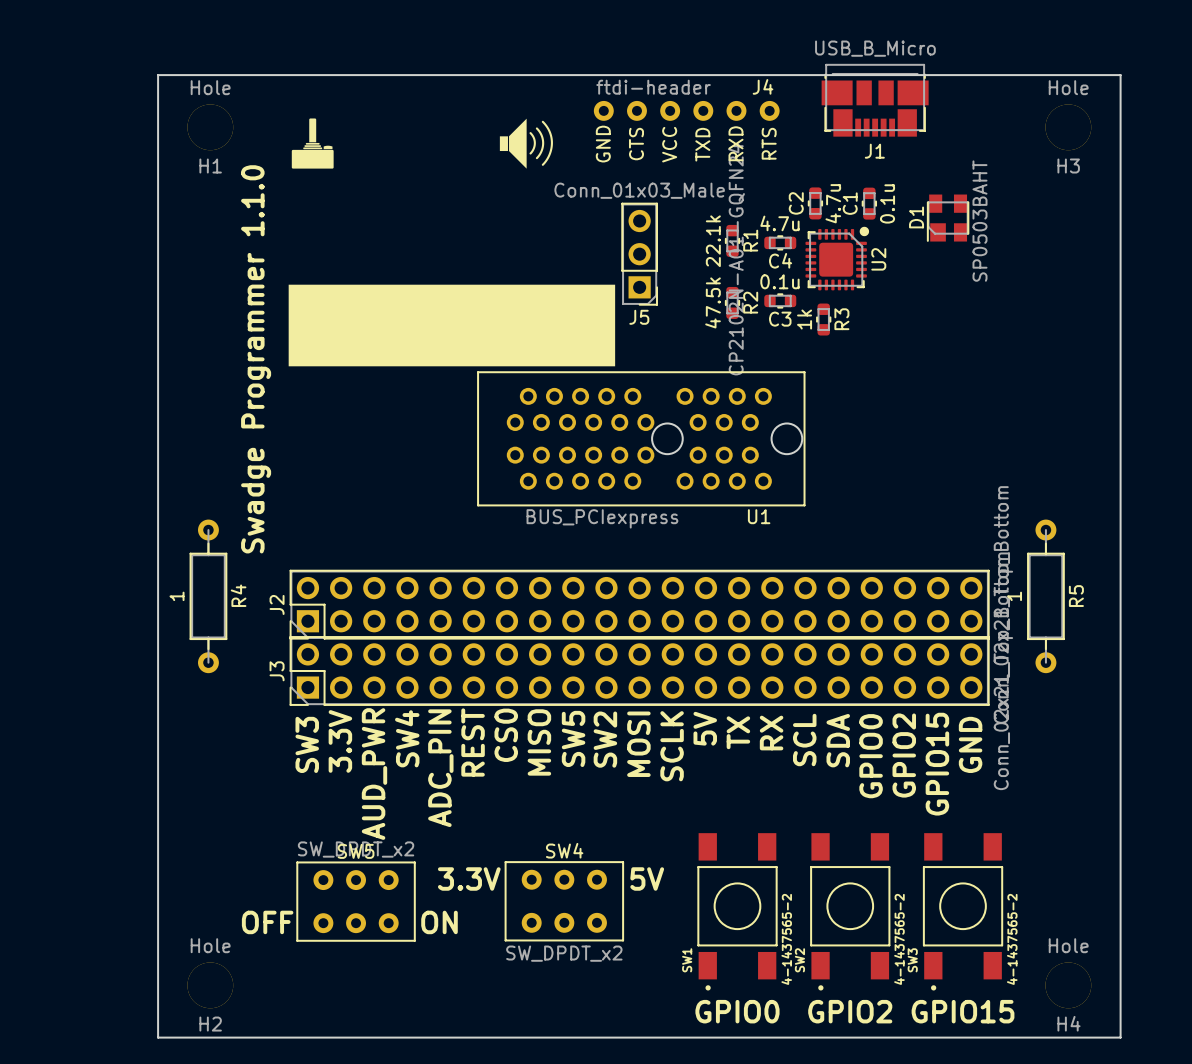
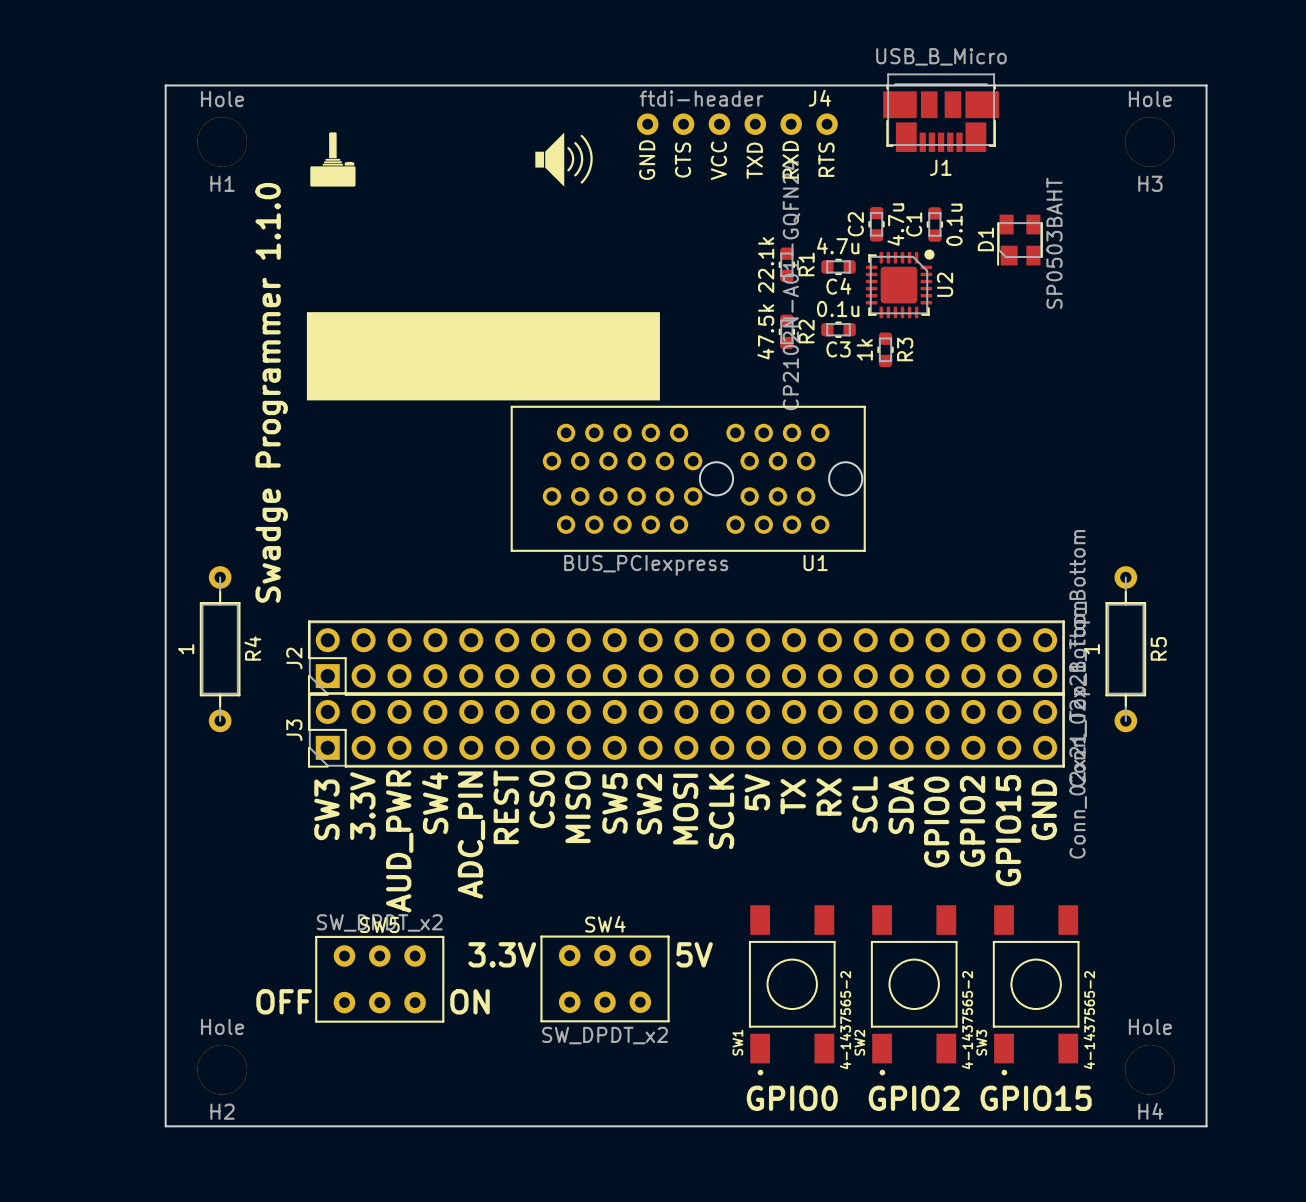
J5: Conn_01x03_Male (639, 254) -> none

